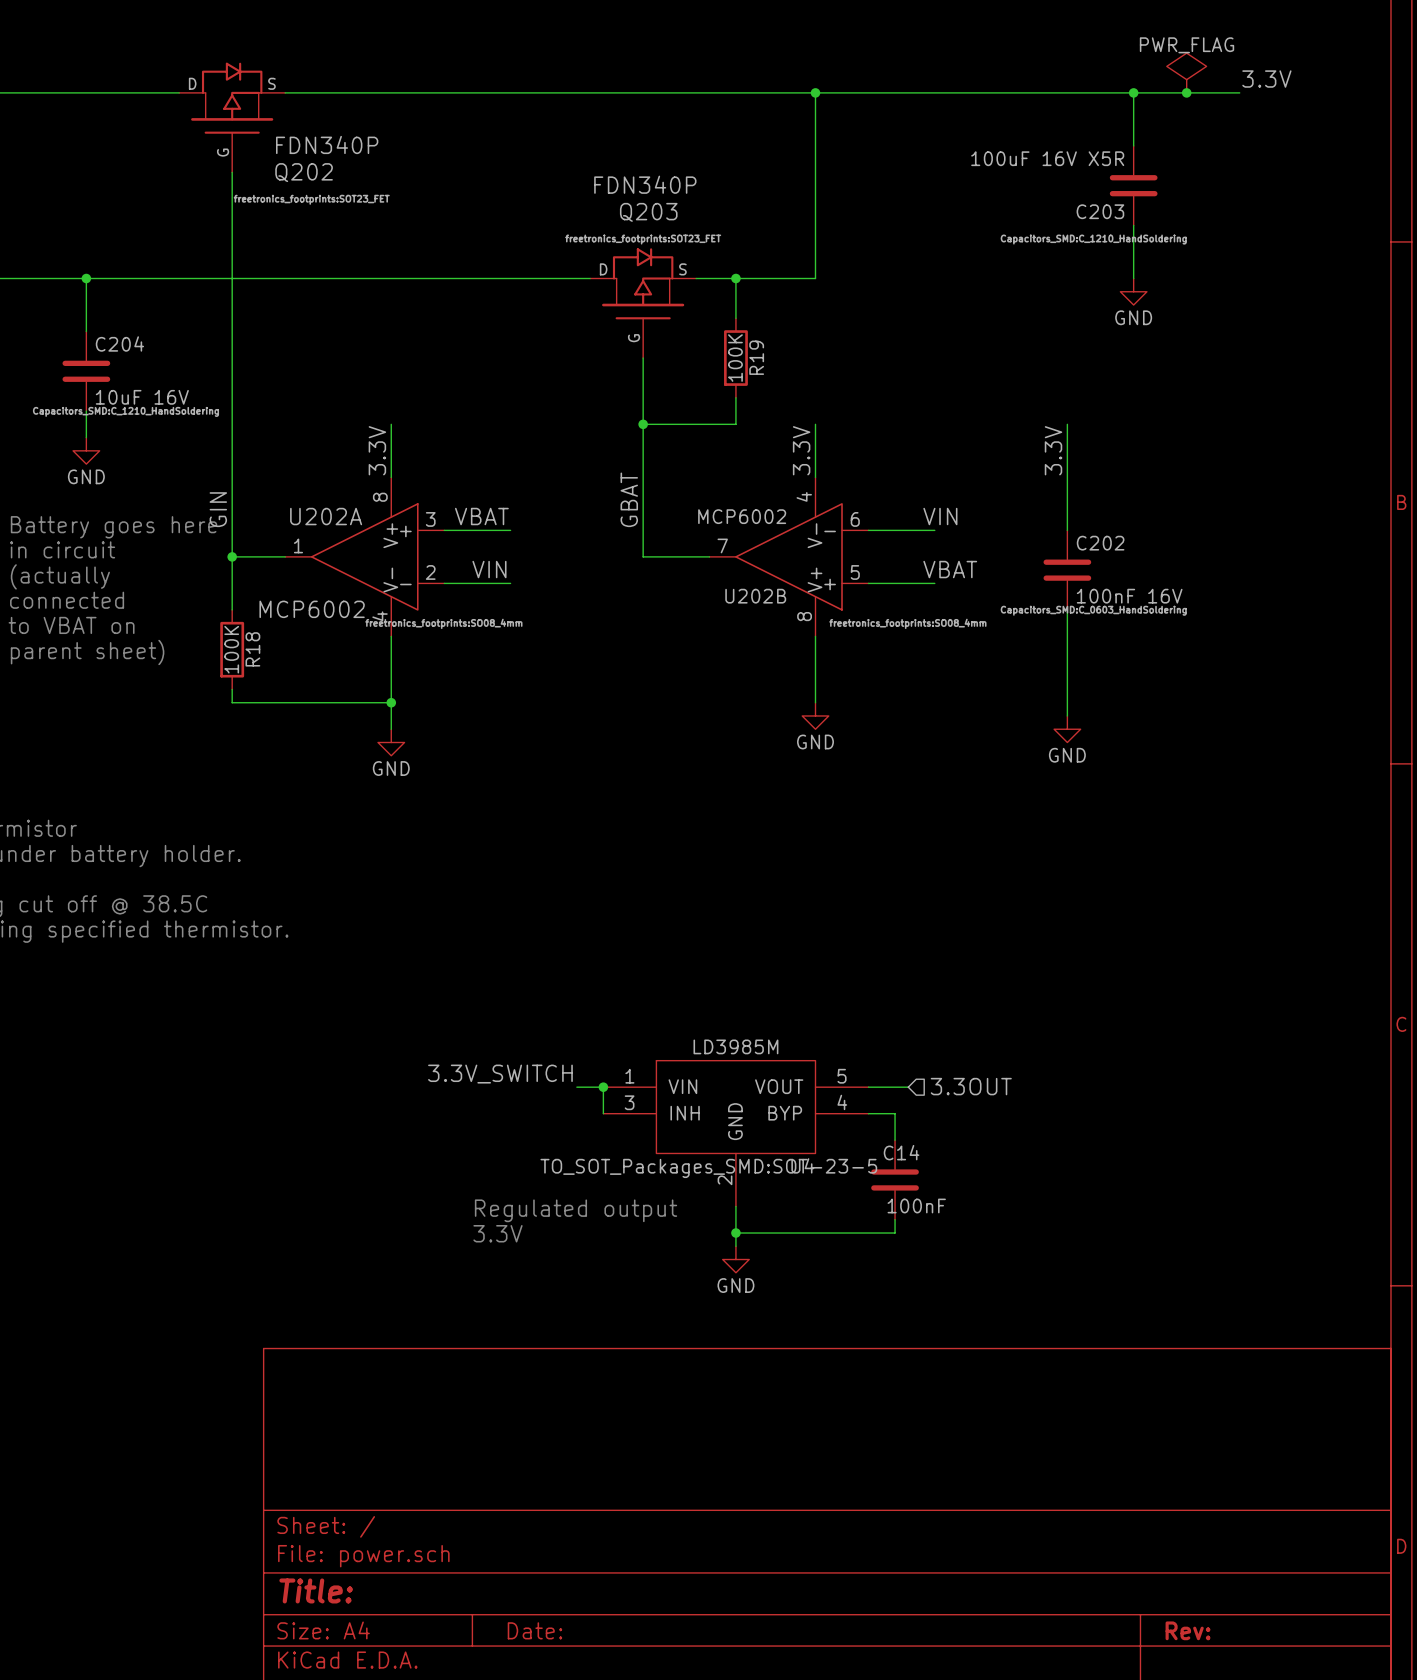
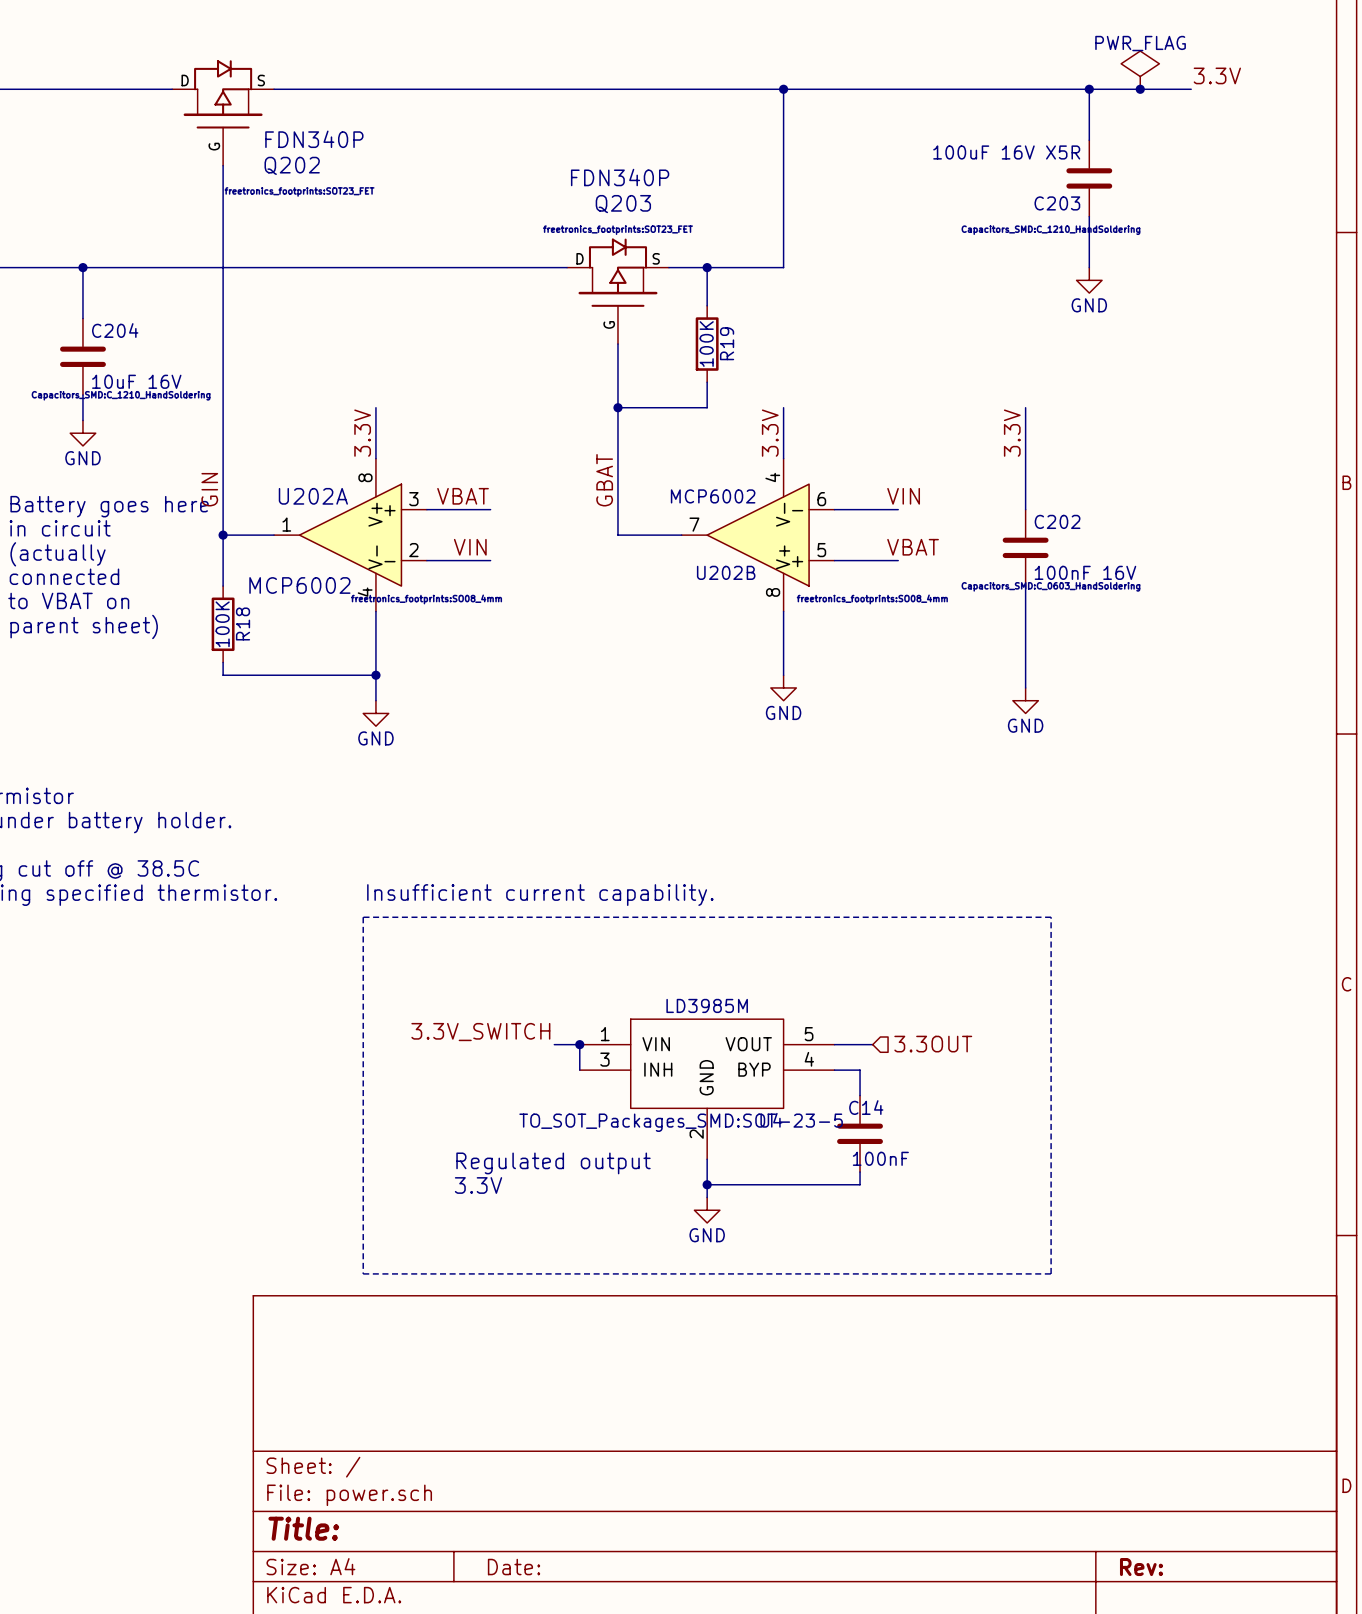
text: none -> Insufficient current capability. (540, 895)
line: none -> (363, 917) (363, 1273) (1051, 1273) (1051, 917) (363, 917)

